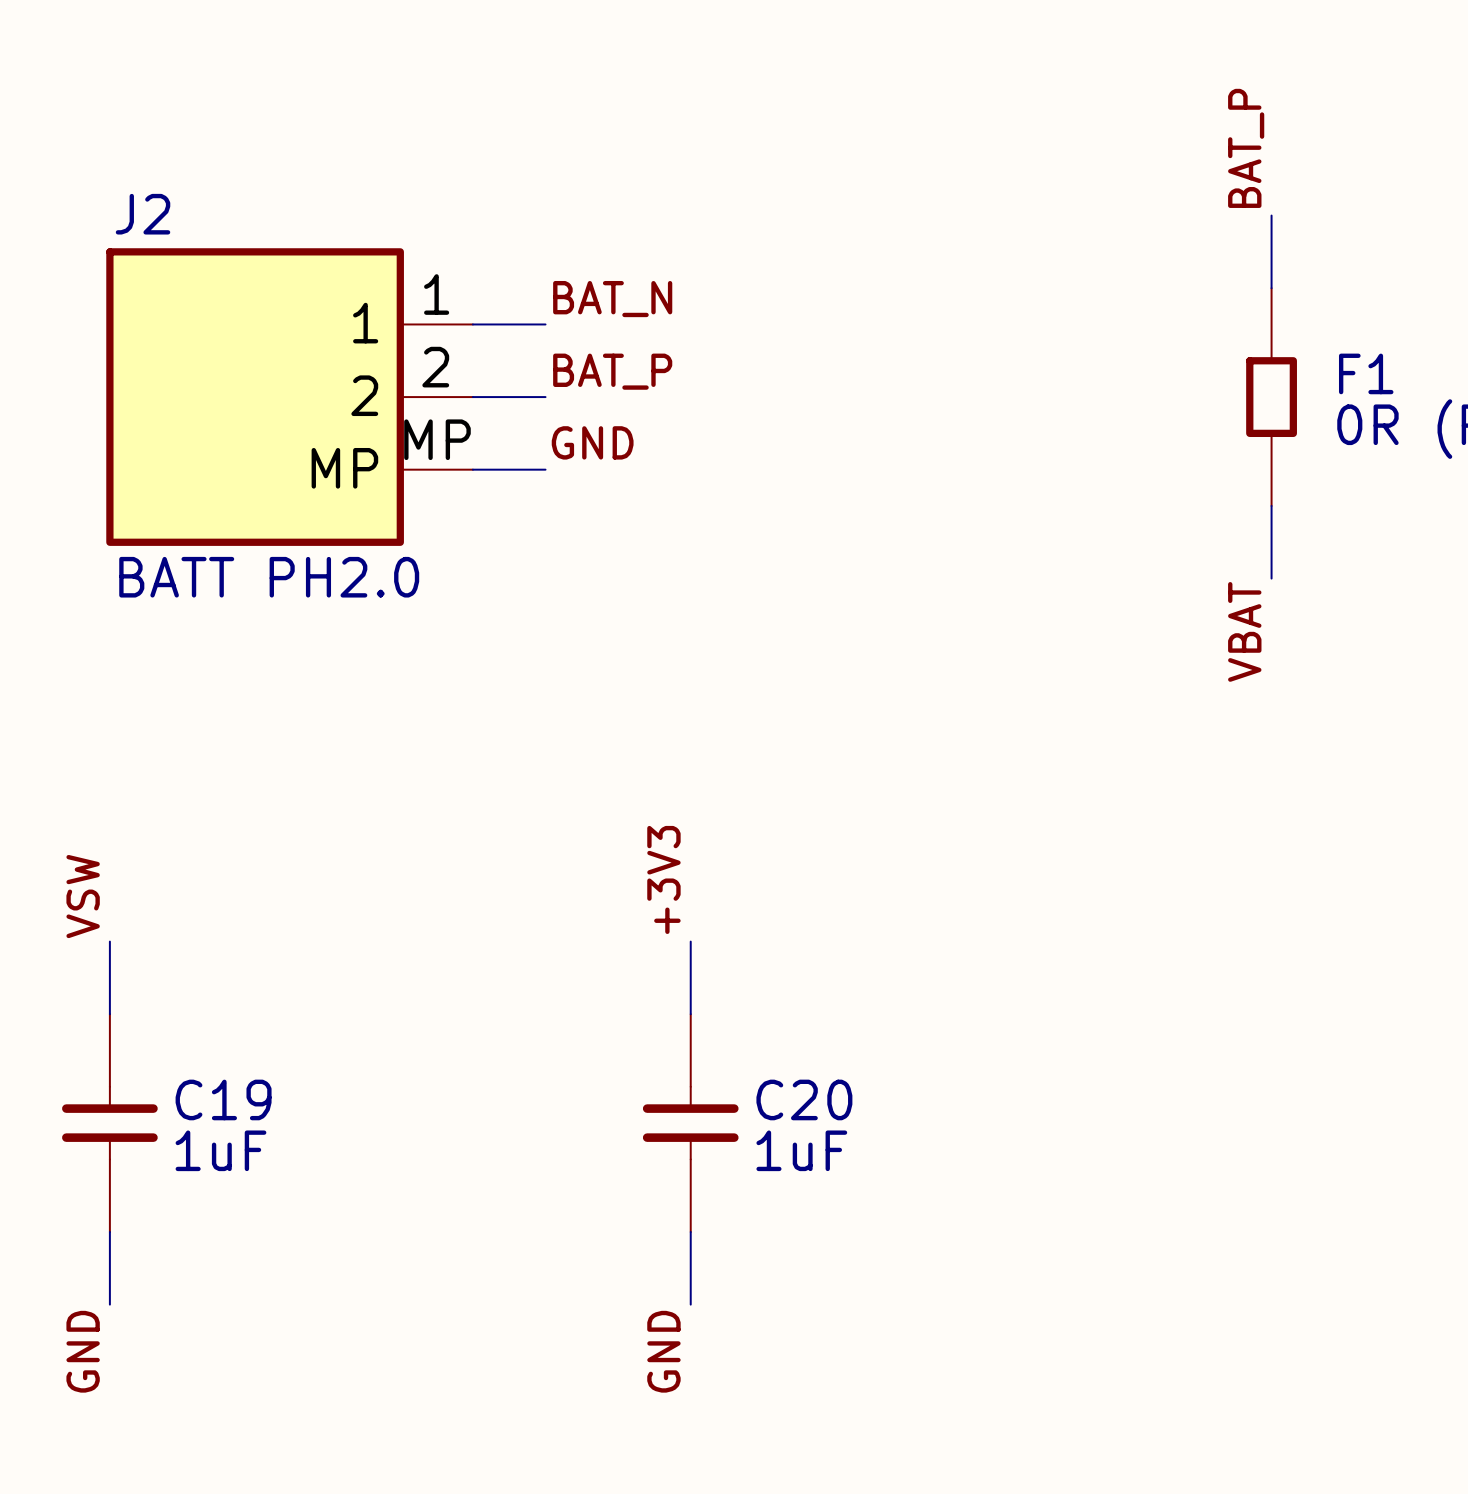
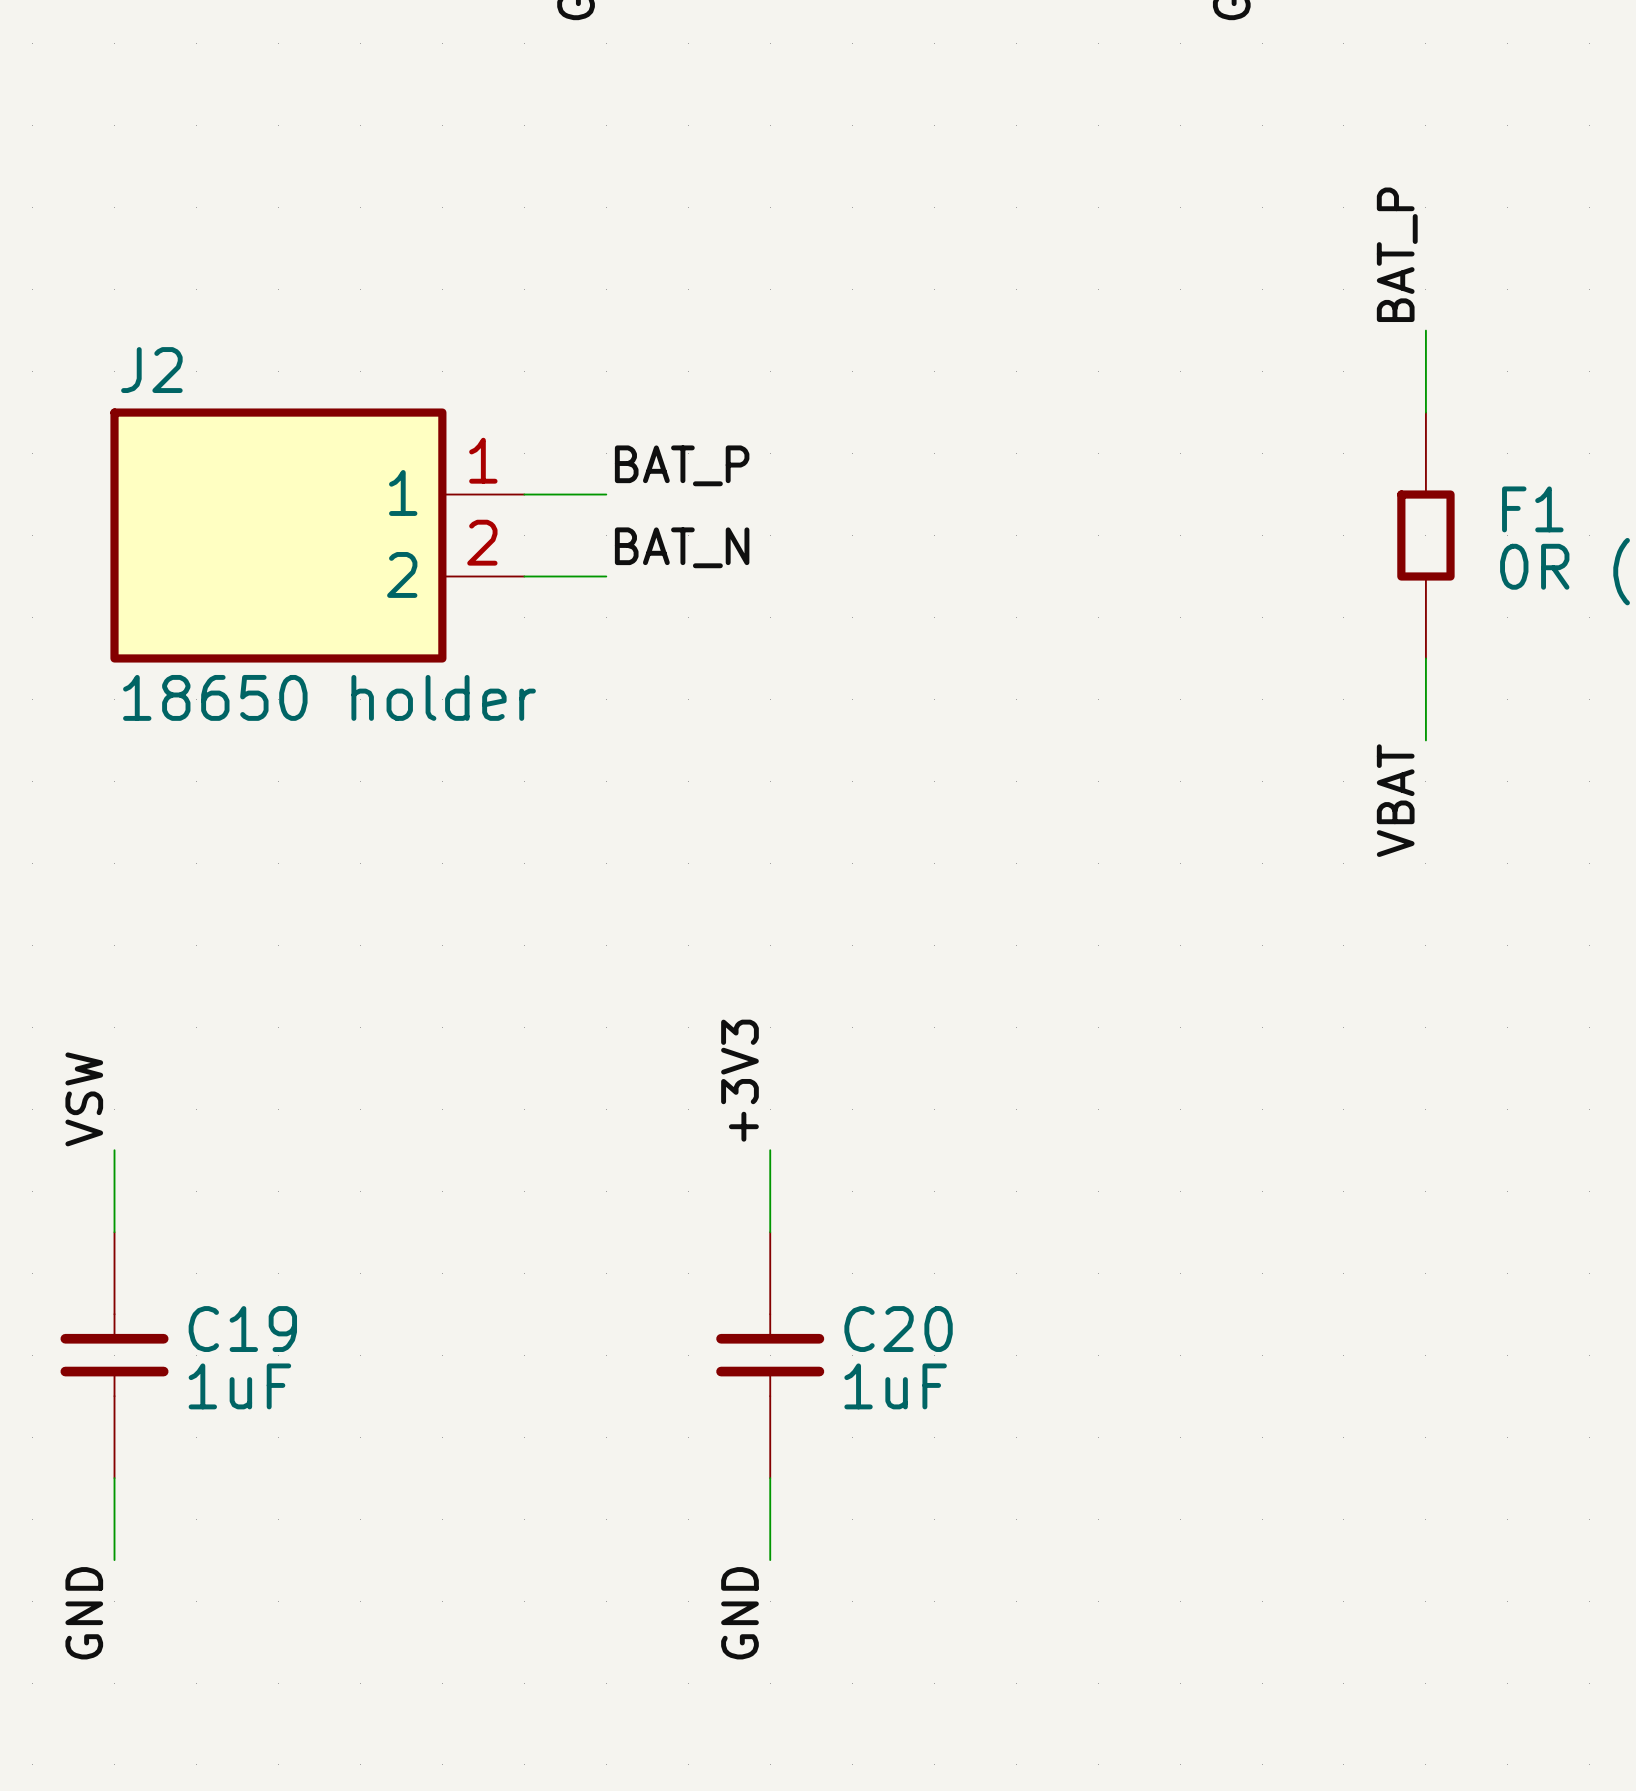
J2 symbol: [106, 248, 473, 546] -> [110, 408, 525, 663]
label position: BAT_N (612, 299) -> BAT_N (682, 547)
wire: (472, 324) (545, 324) -> (524, 494) (606, 494)
label position: BAT_P (612, 371) -> BAT_P (682, 465)
wire: (472, 397) (545, 397) -> (524, 576) (606, 576)
label: GND (592, 442) -> none
wire: (472, 469) (545, 469) -> none
J2 value: BATT PH2.0 (269, 577) -> 18650 holder (329, 697)

